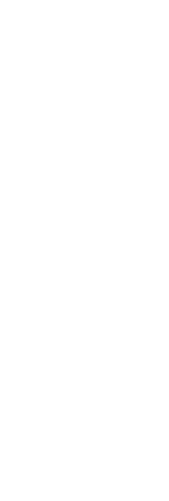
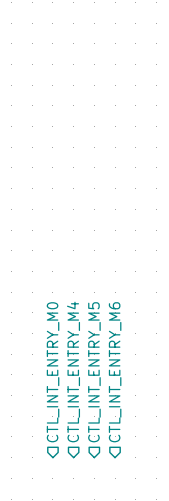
sheet pin: none -> CTL_INT_ENTRY_M0 (53, 372)
sheet pin: none -> CTL_INT_ENTRY_M4 (73, 372)
sheet pin: none -> CTL_INT_ENTRY_M5 (94, 372)
sheet pin: none -> CTL_INT_ENTRY_M6 (115, 372)

